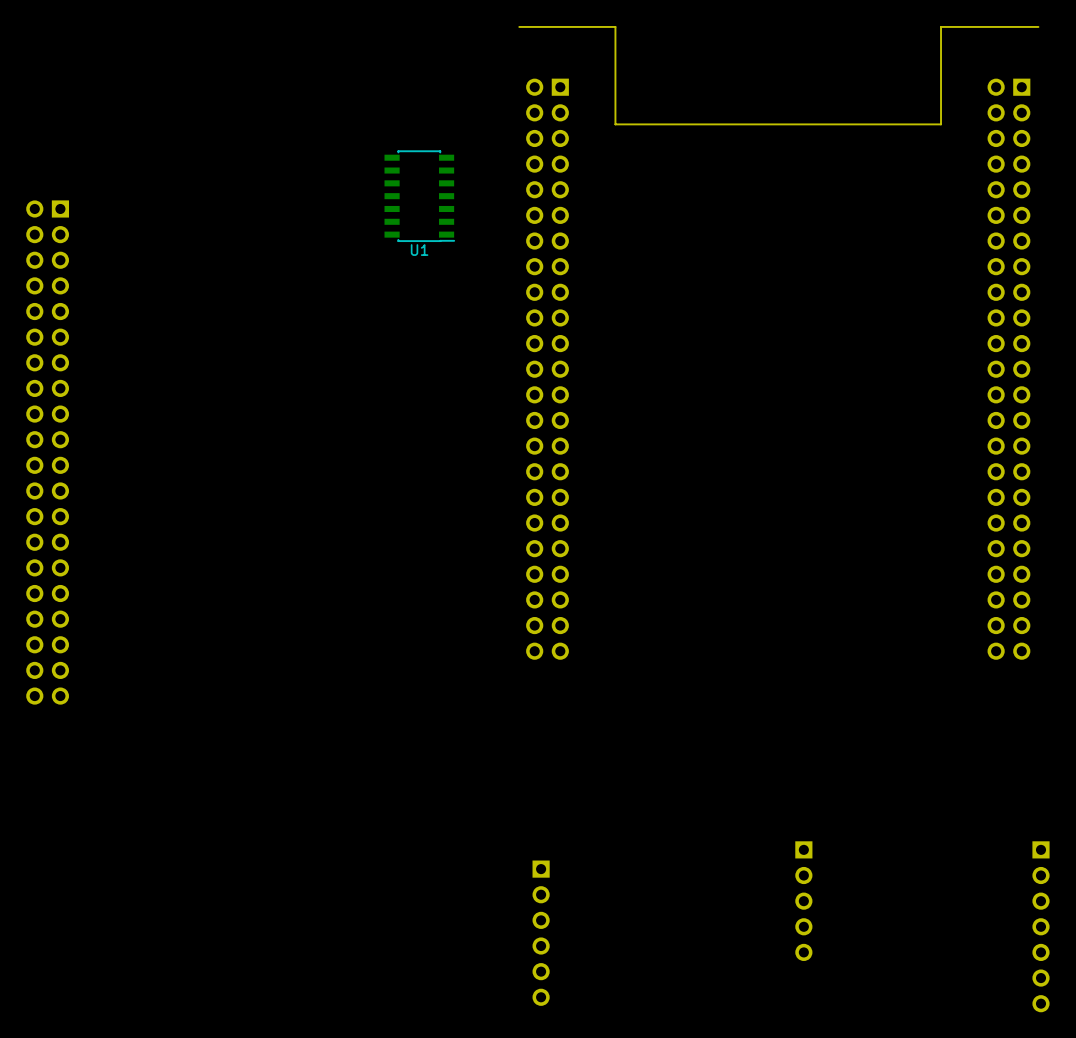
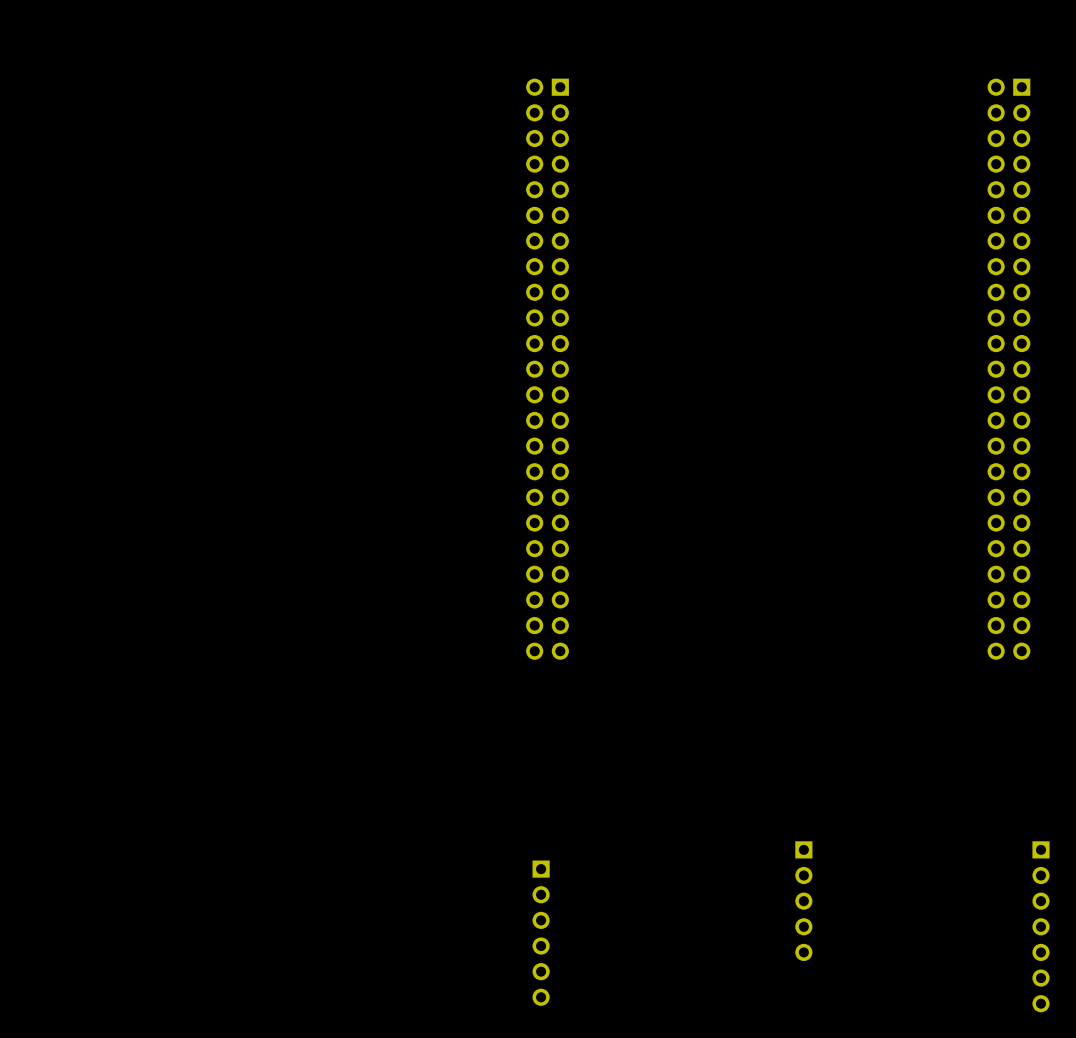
board edge: (1038, 26) (941, 26) (941, 124) (615, 124) (615, 26) (519, 26) -> none
U1: (419, 196) -> none
part: (47, 452) -> none

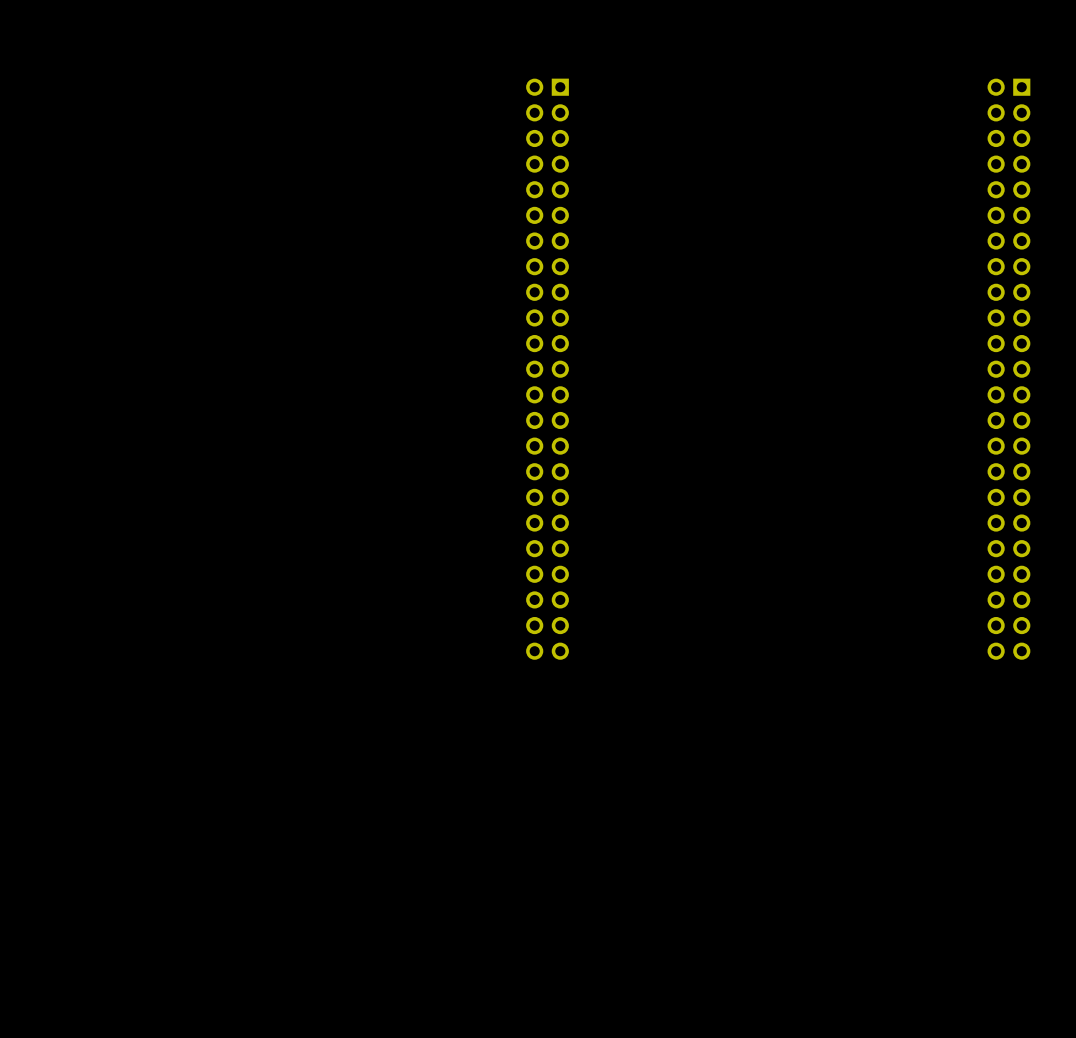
part: (803, 901) -> none
part: (1040, 926) -> none
part: (541, 933) -> none

